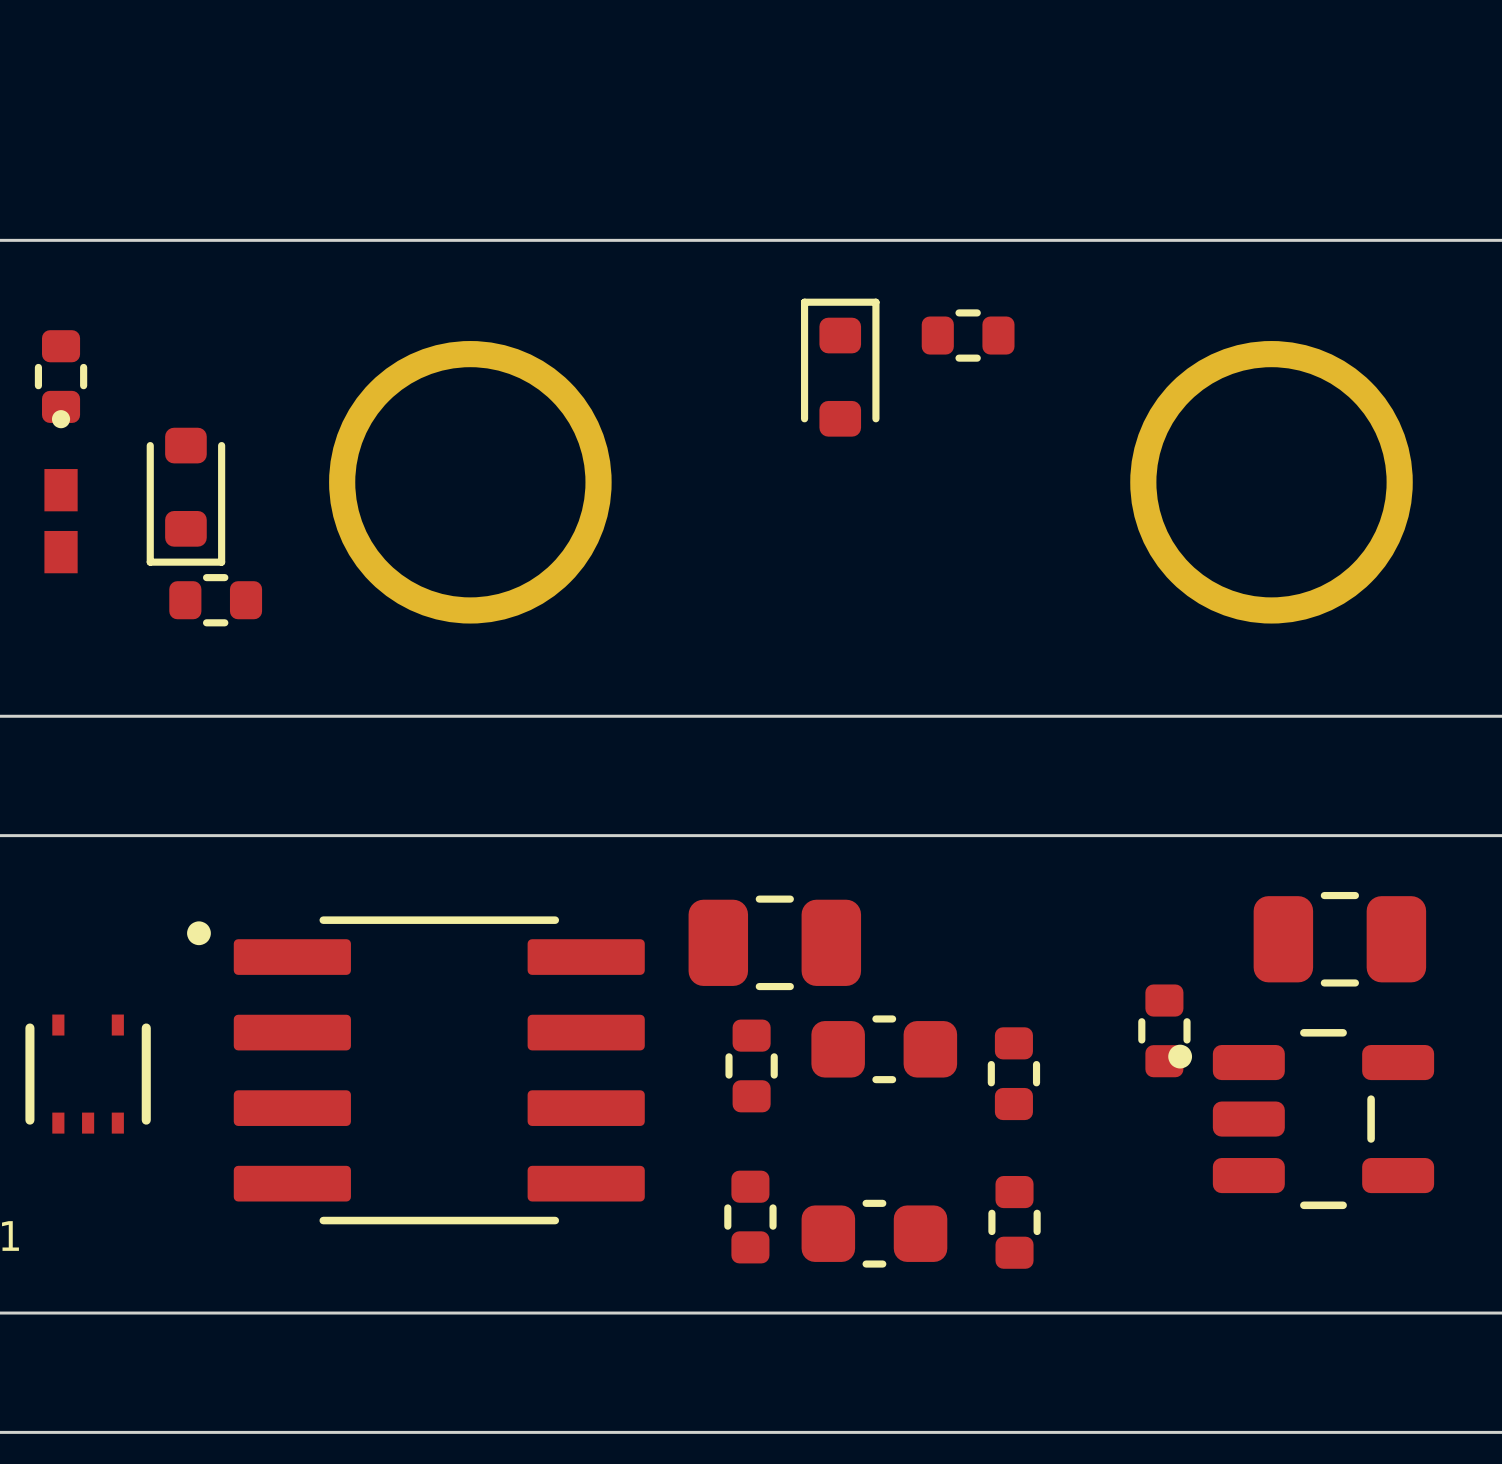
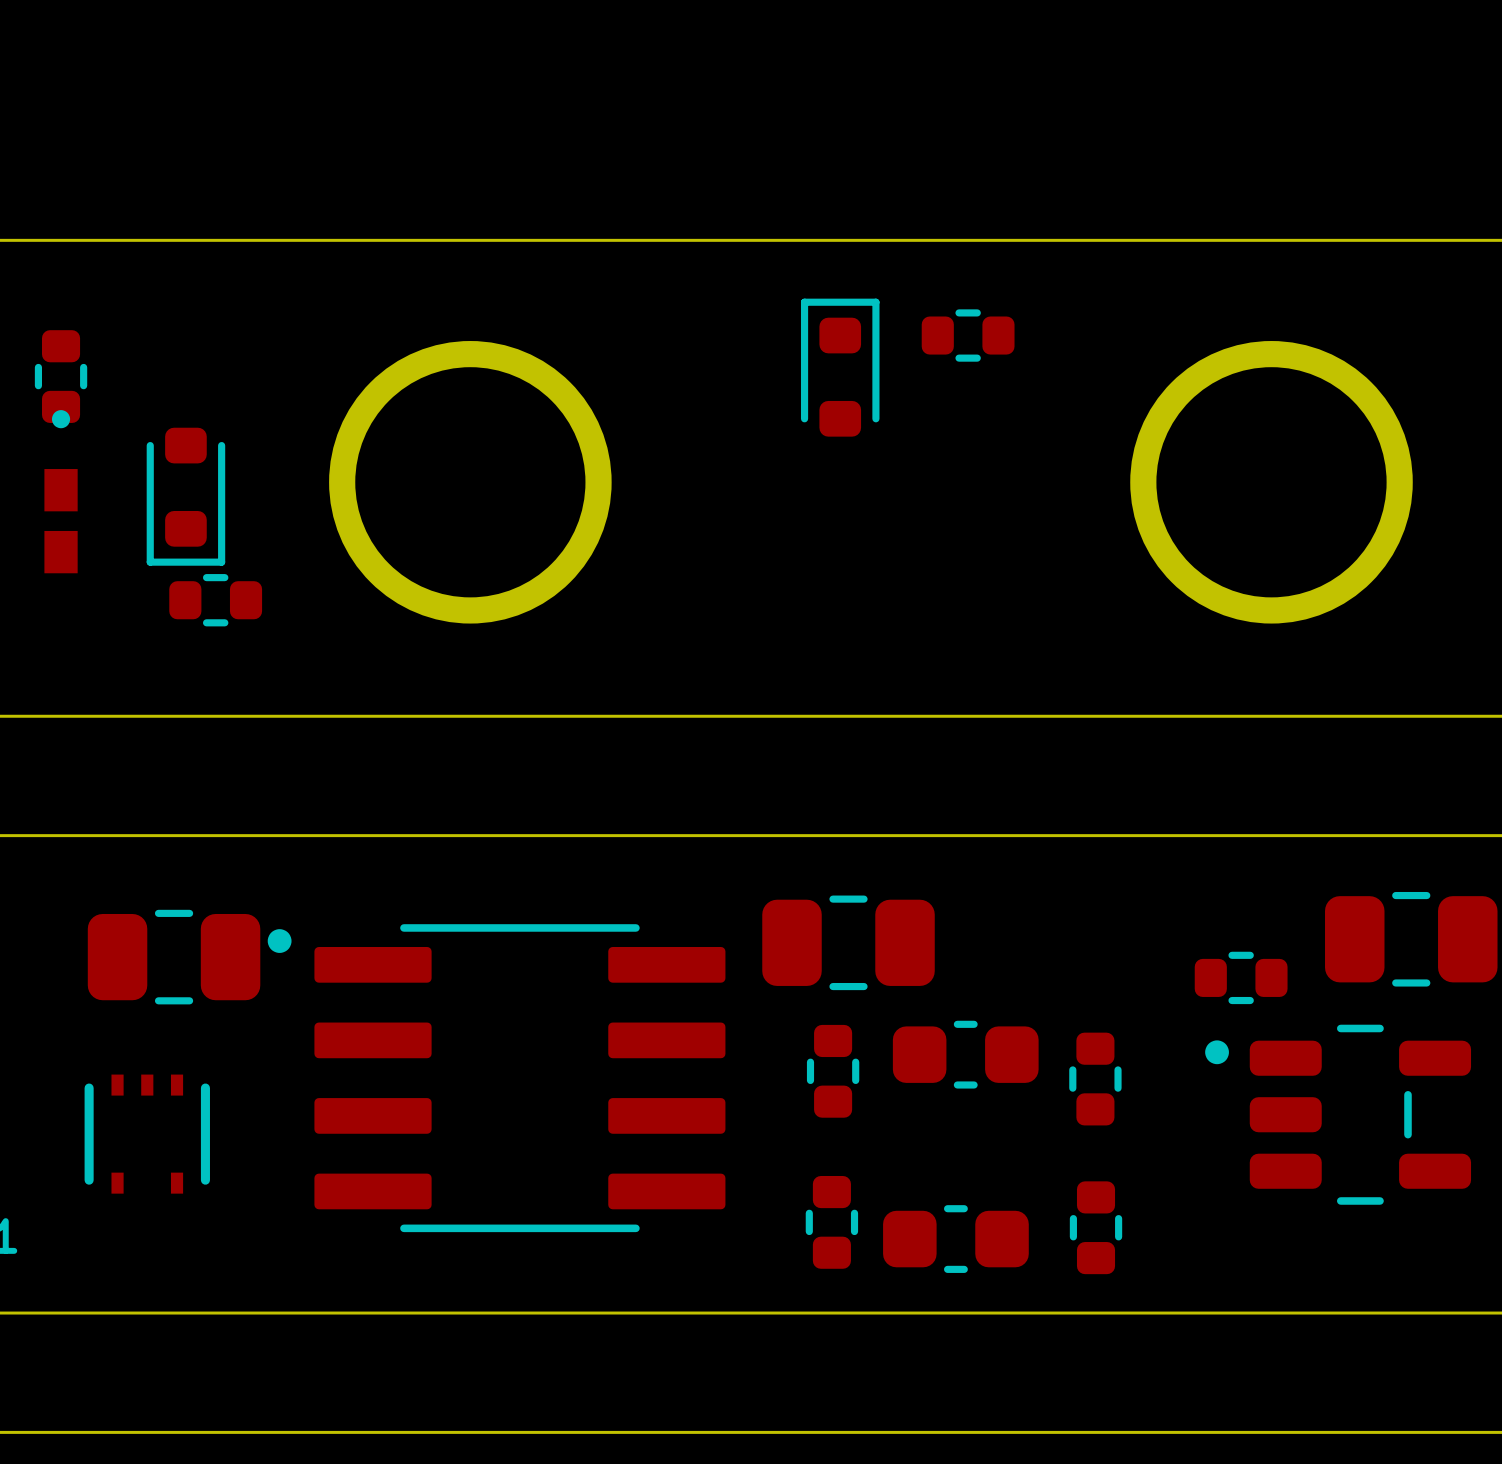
part position: (1339, 939) -> (1411, 939)
part position: (774, 942) -> (848, 942)
part: none -> (174, 957)
part: none -> (1241, 977)
part: (1164, 1030) -> none
part position: (884, 1049) -> (965, 1054)
part position: (751, 1065) -> (833, 1071)
part position: (415, 1070) -> (496, 1078)
part: (1013, 1073) -> none
part rotation: 0° (88, 1074) -> 180° (147, 1134)
part position: (88, 1074) -> (147, 1134)
part: none -> (1095, 1079)
part position: (1301, 1119) -> (1338, 1114)
part position: (750, 1217) -> (831, 1222)
part position: (1014, 1222) -> (1096, 1227)
part position: (874, 1233) -> (955, 1239)

